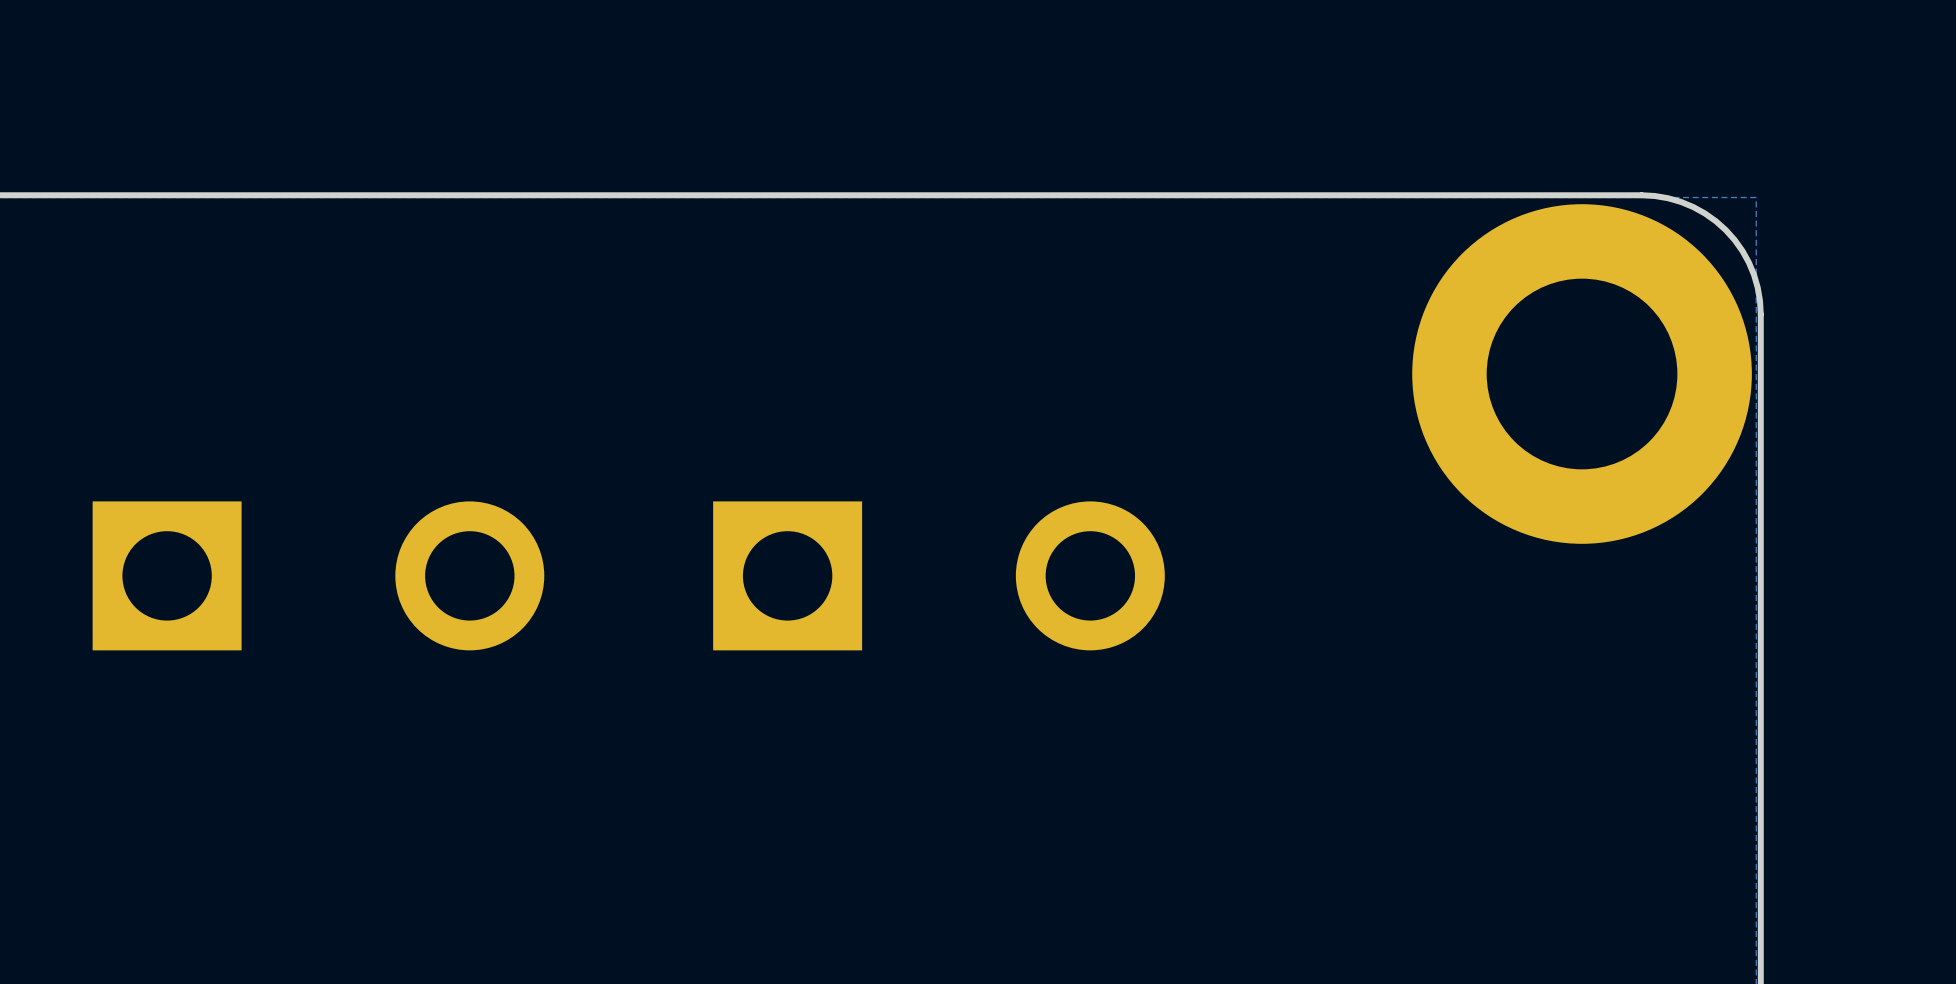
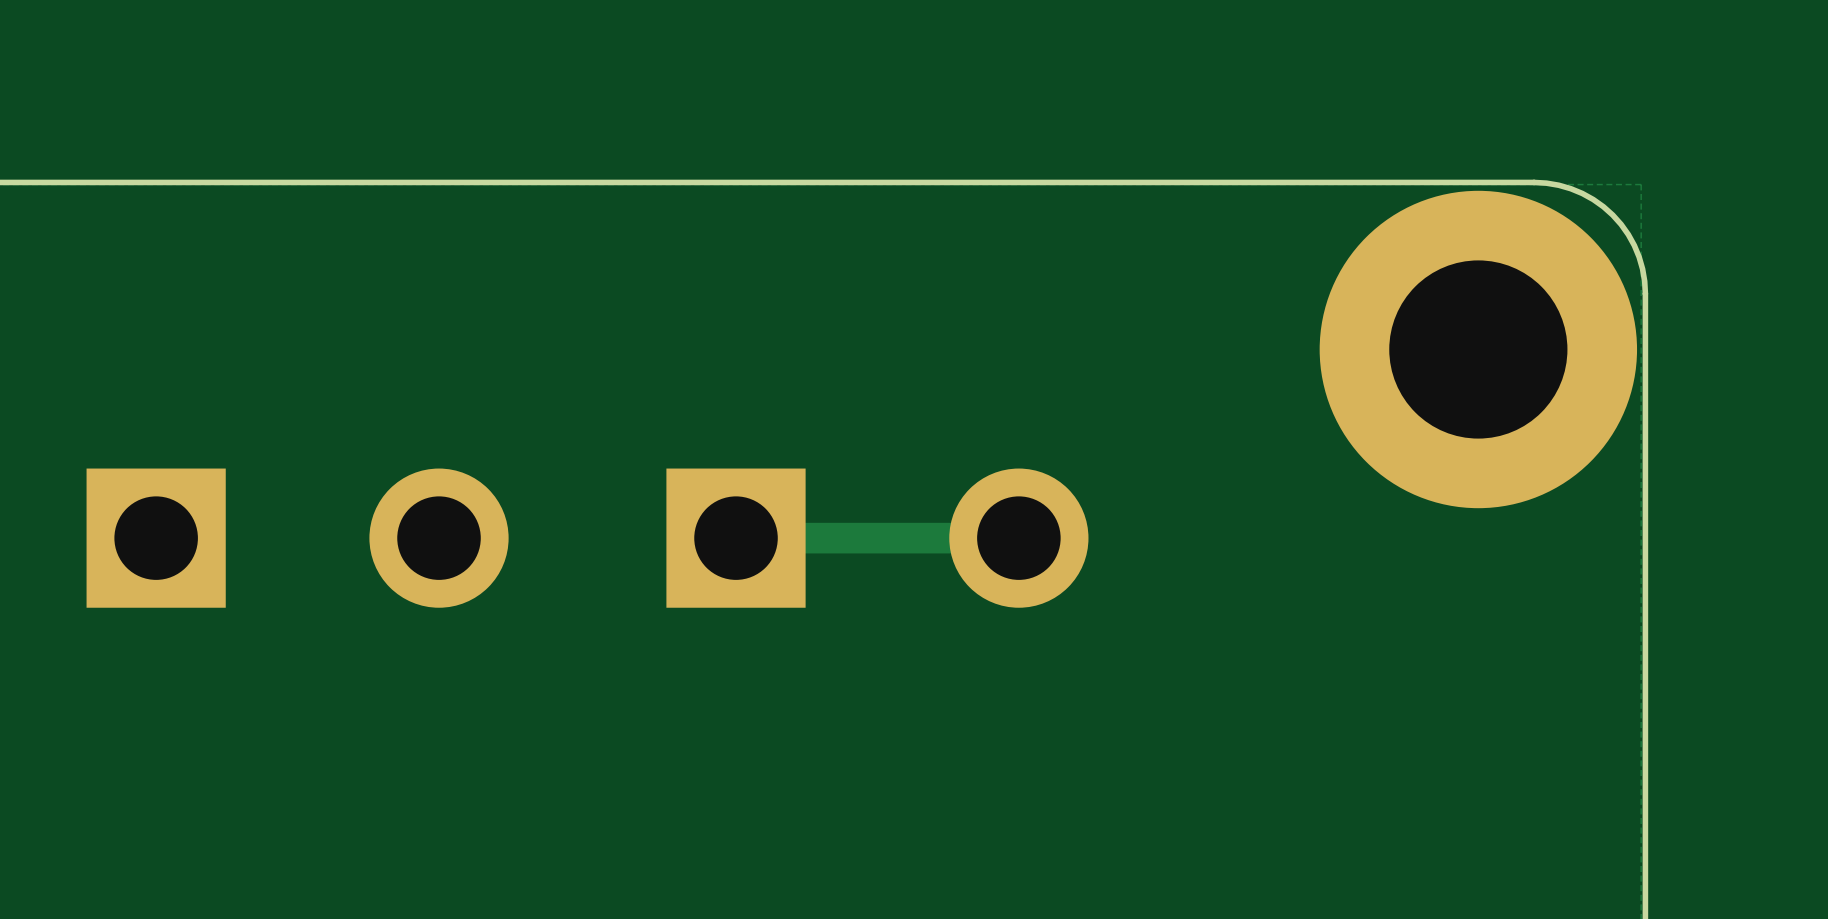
track: none -> (1018, 538) (736, 538)

